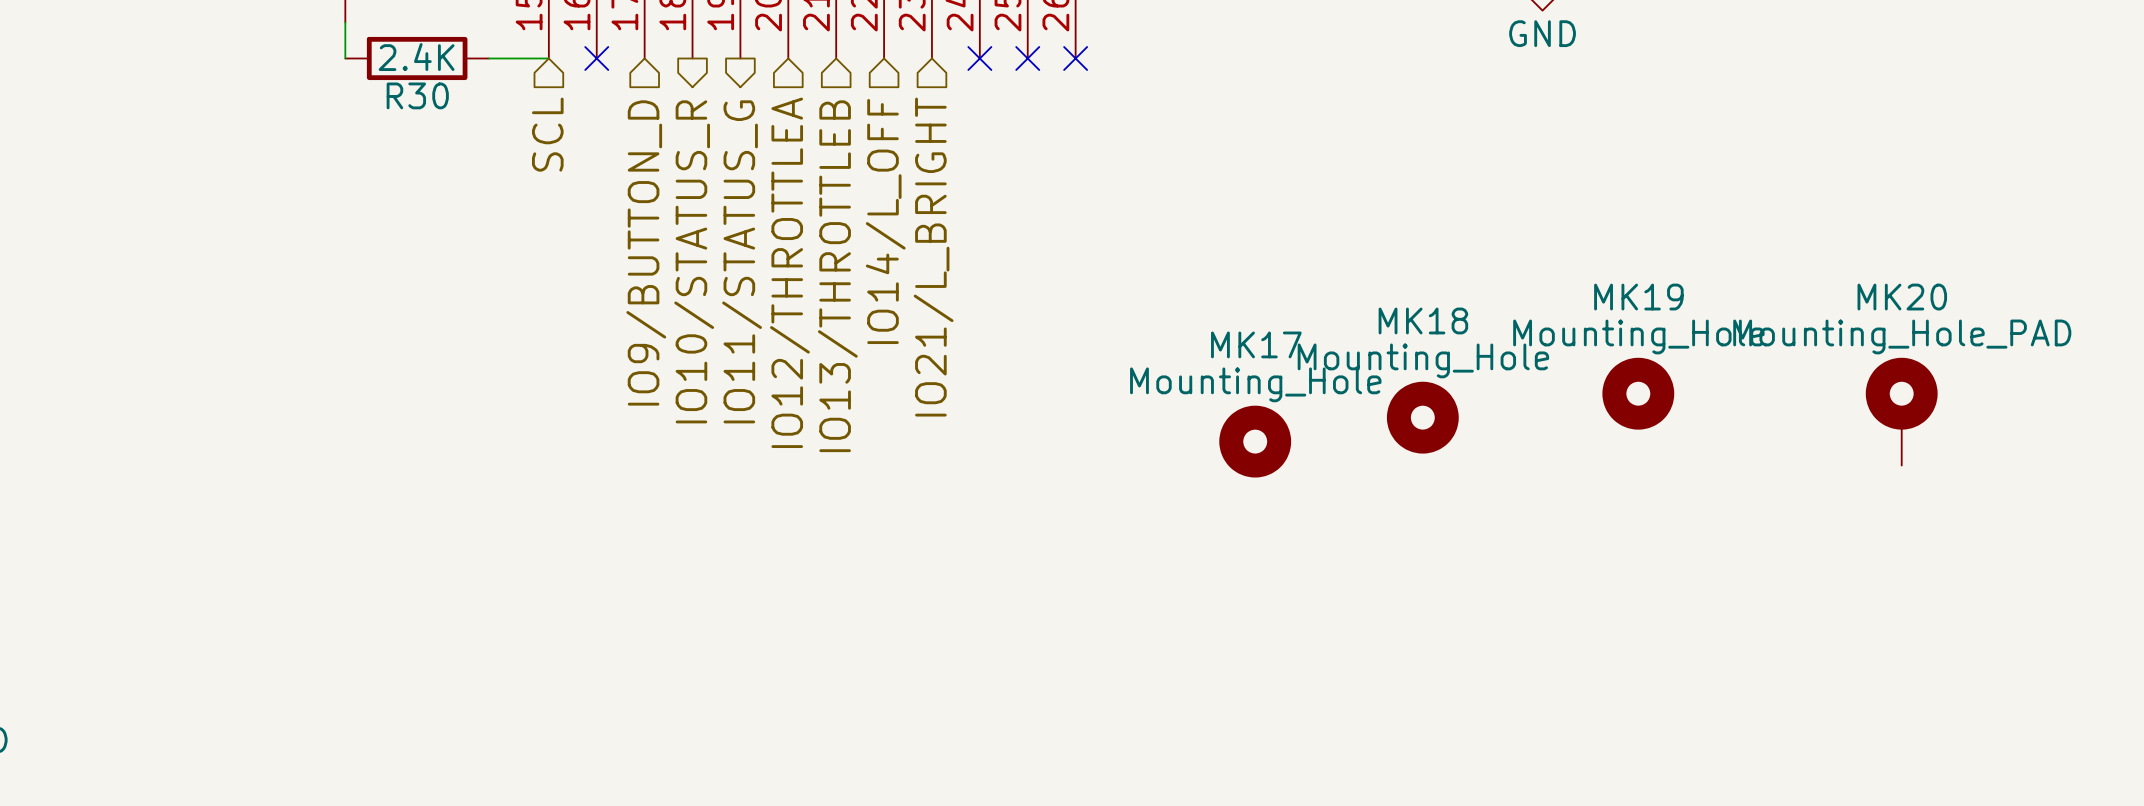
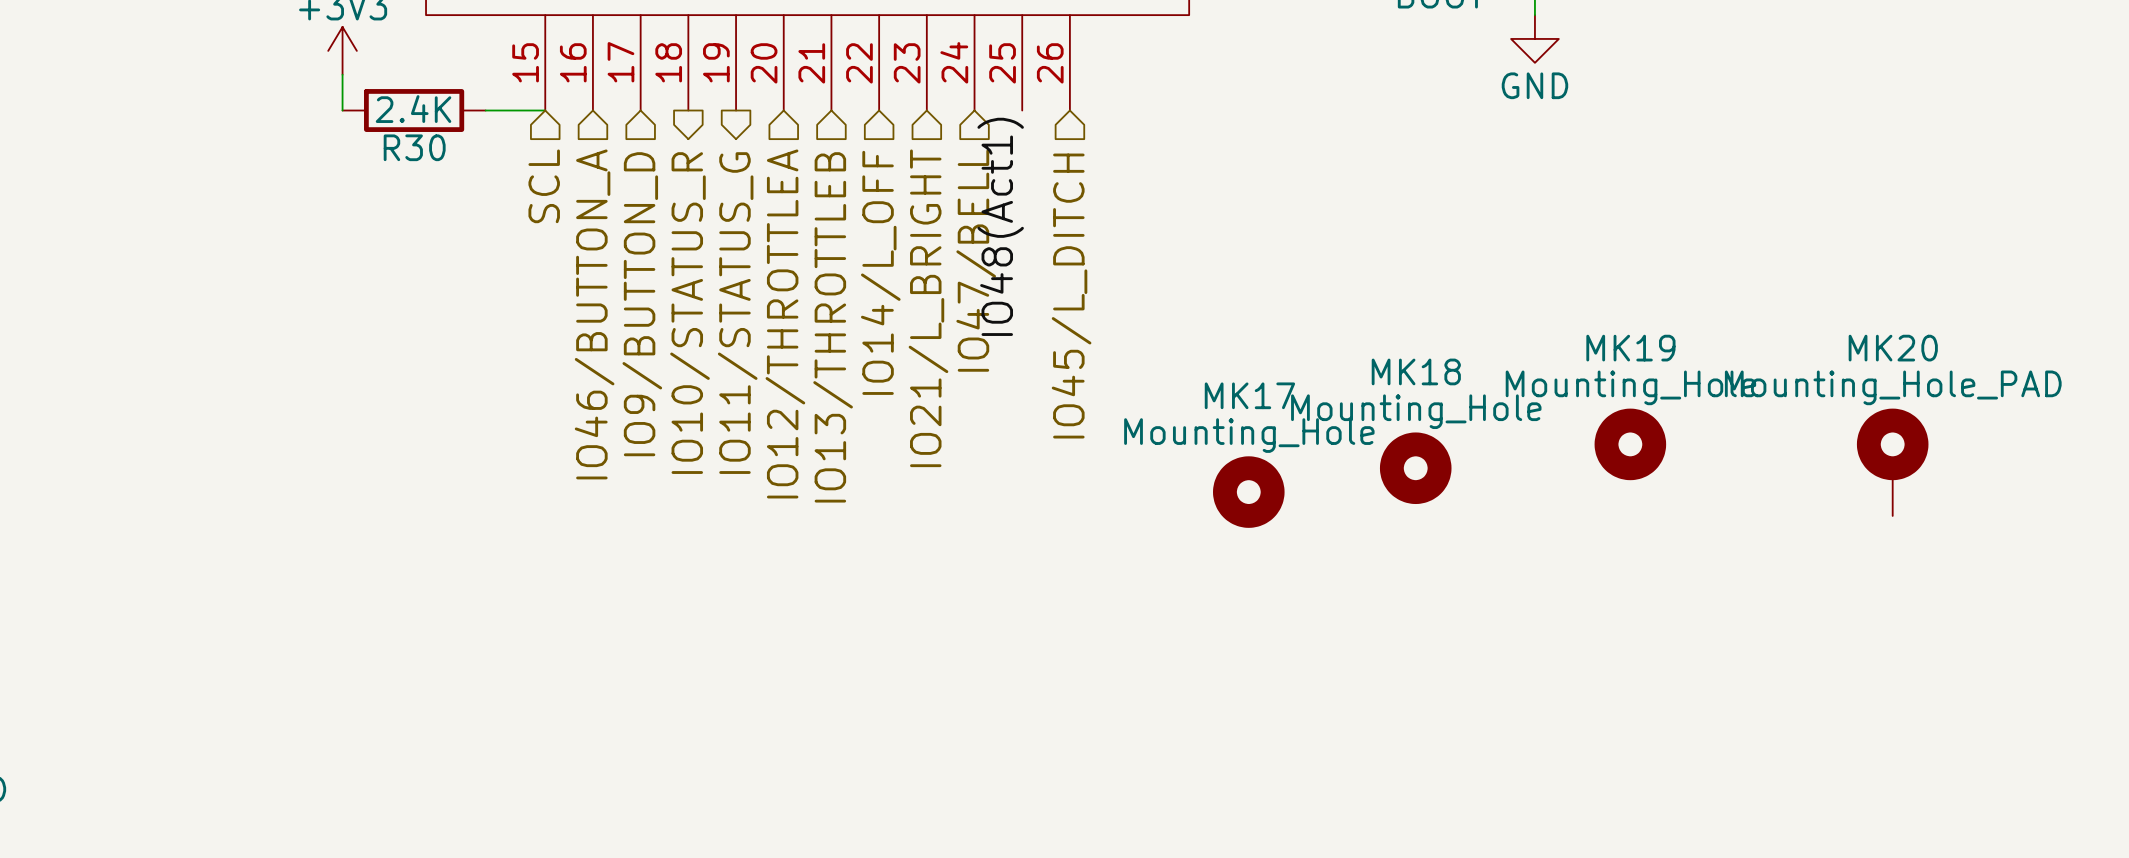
no-connect mark: (596, 58) -> none
no-connect mark: (979, 58) -> none
no-connect mark: (1027, 58) -> none
no-connect mark: (1075, 58) -> none
label: none -> IO48(Act1) (1000, 226)
hierarchical label: none -> IO47/BELL (976, 260)
hierarchical label: none -> IO45/L_DITCH (1071, 296)
hierarchical label: none -> IO46/BUTTON_A (594, 314)

